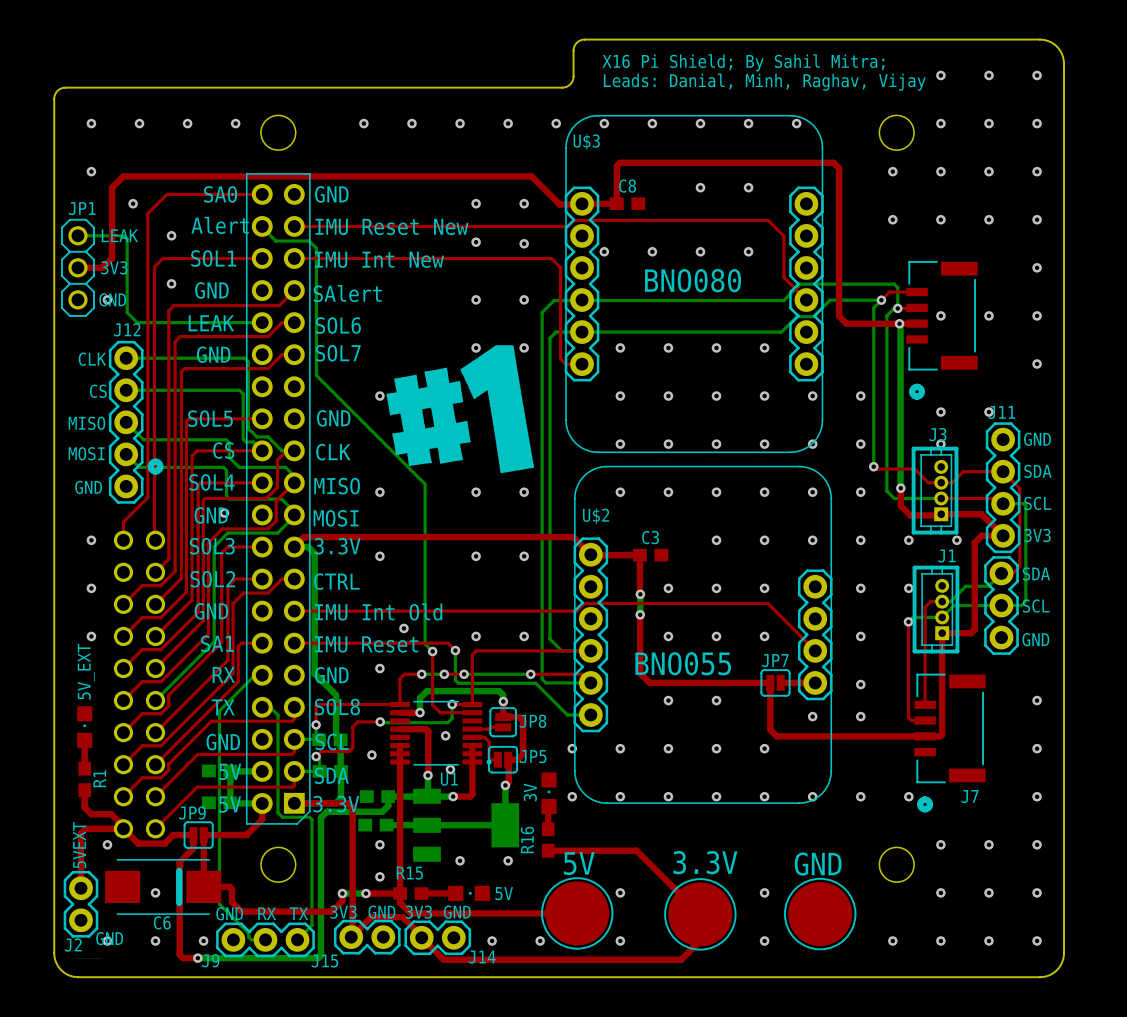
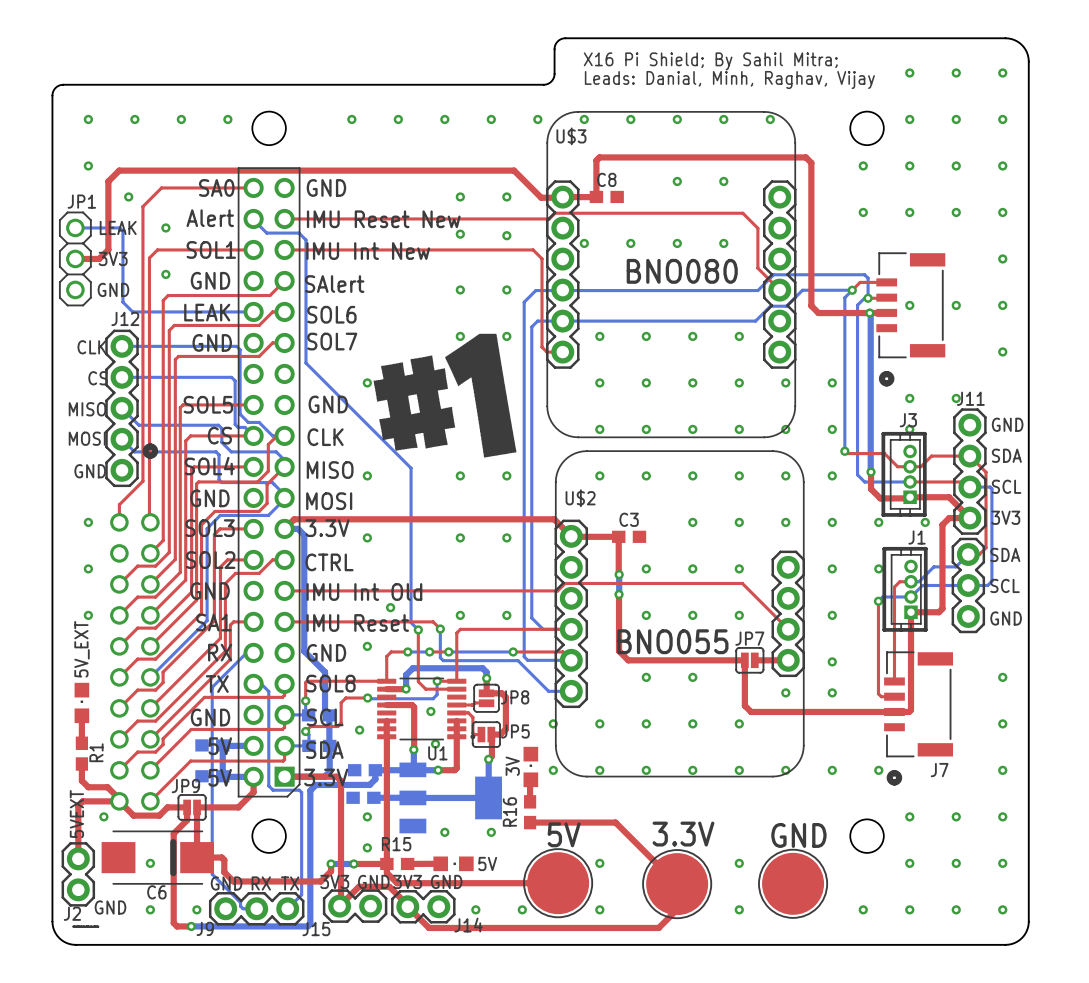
via: (107, 299) -> none
via: (224, 513) -> none
via: (107, 940) -> none

